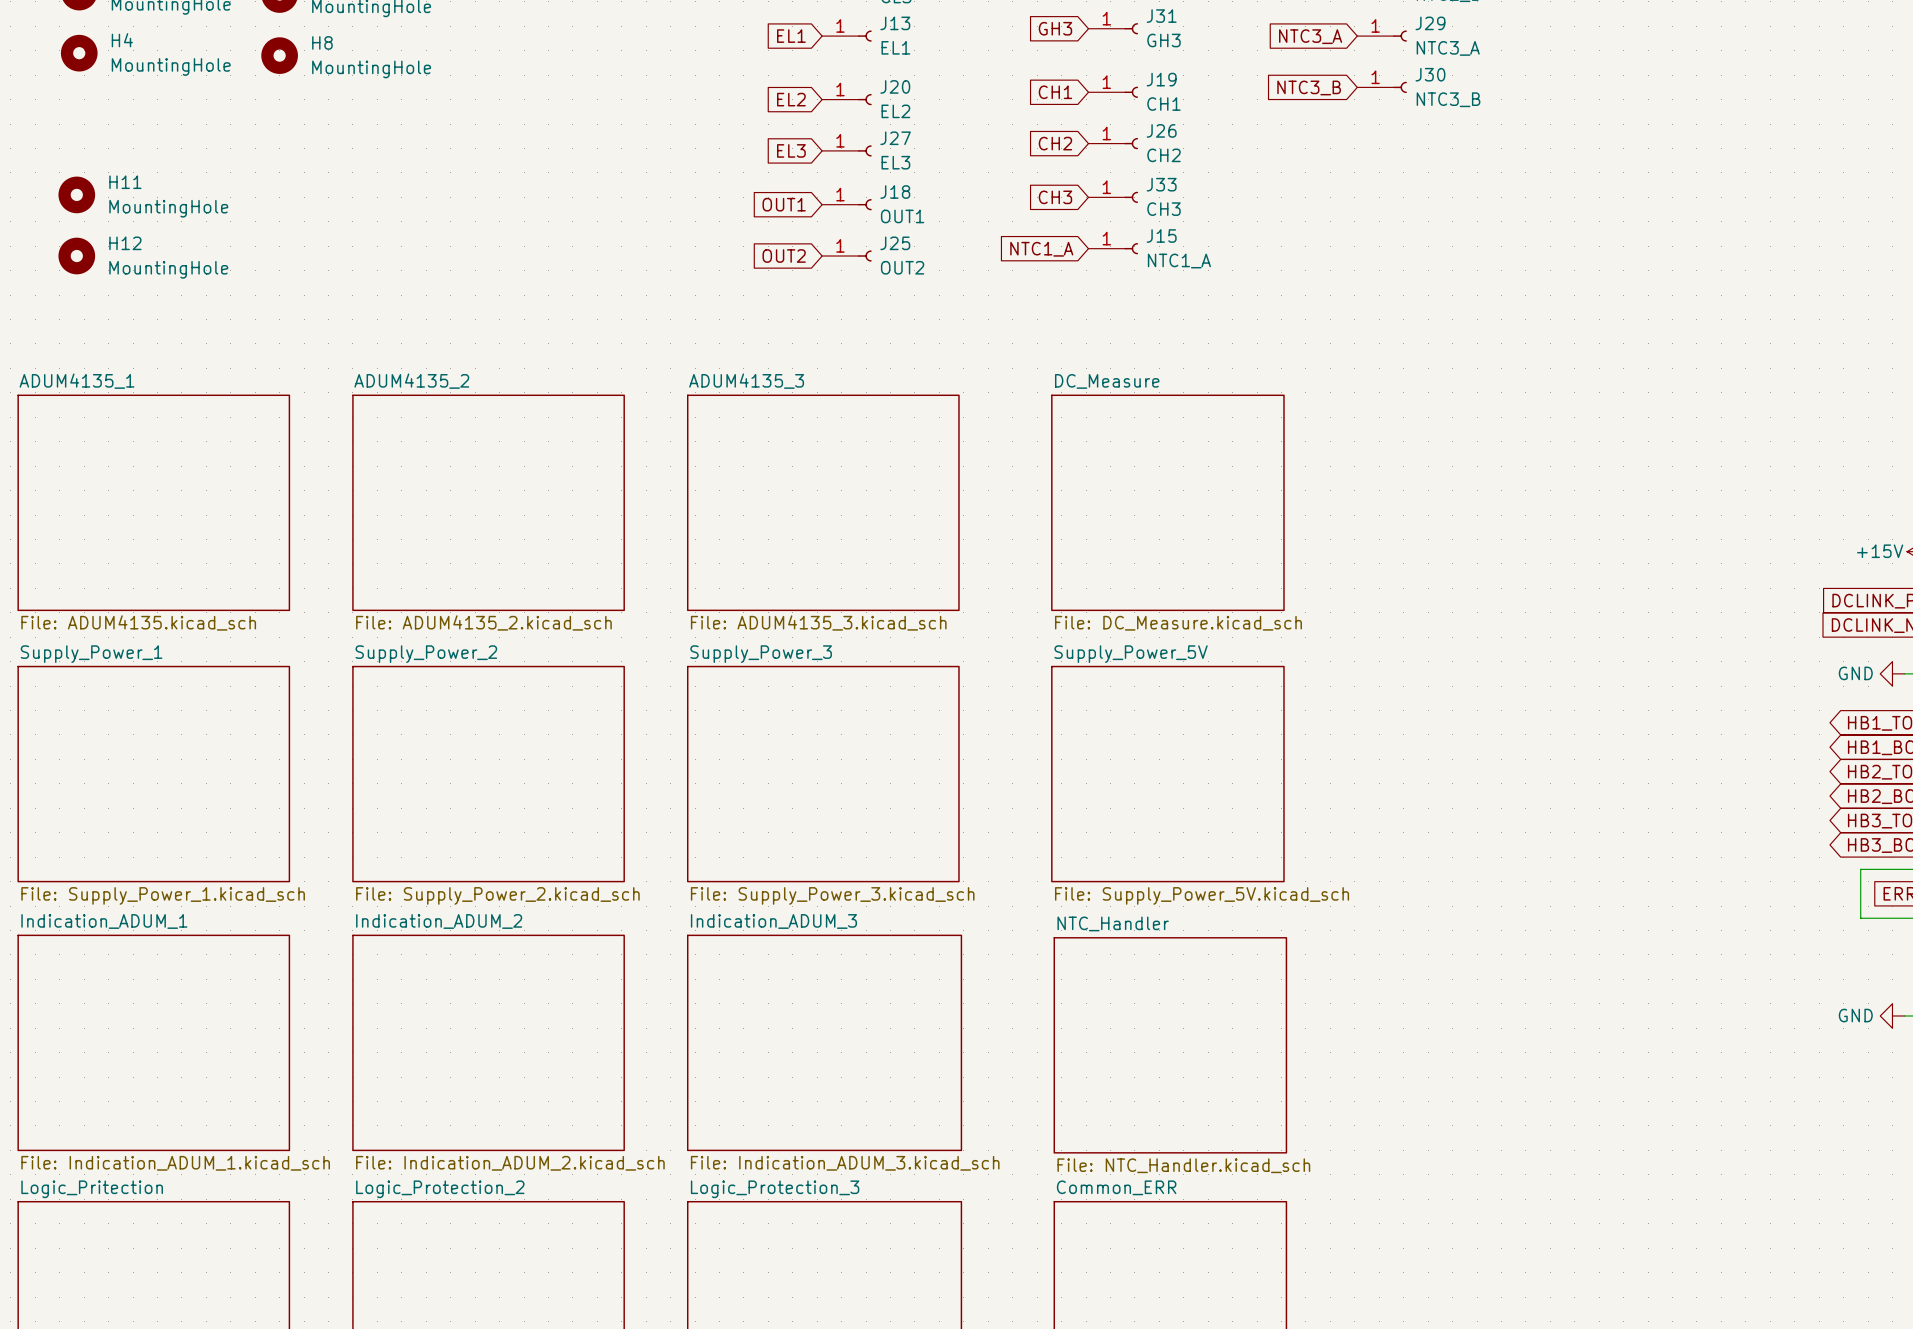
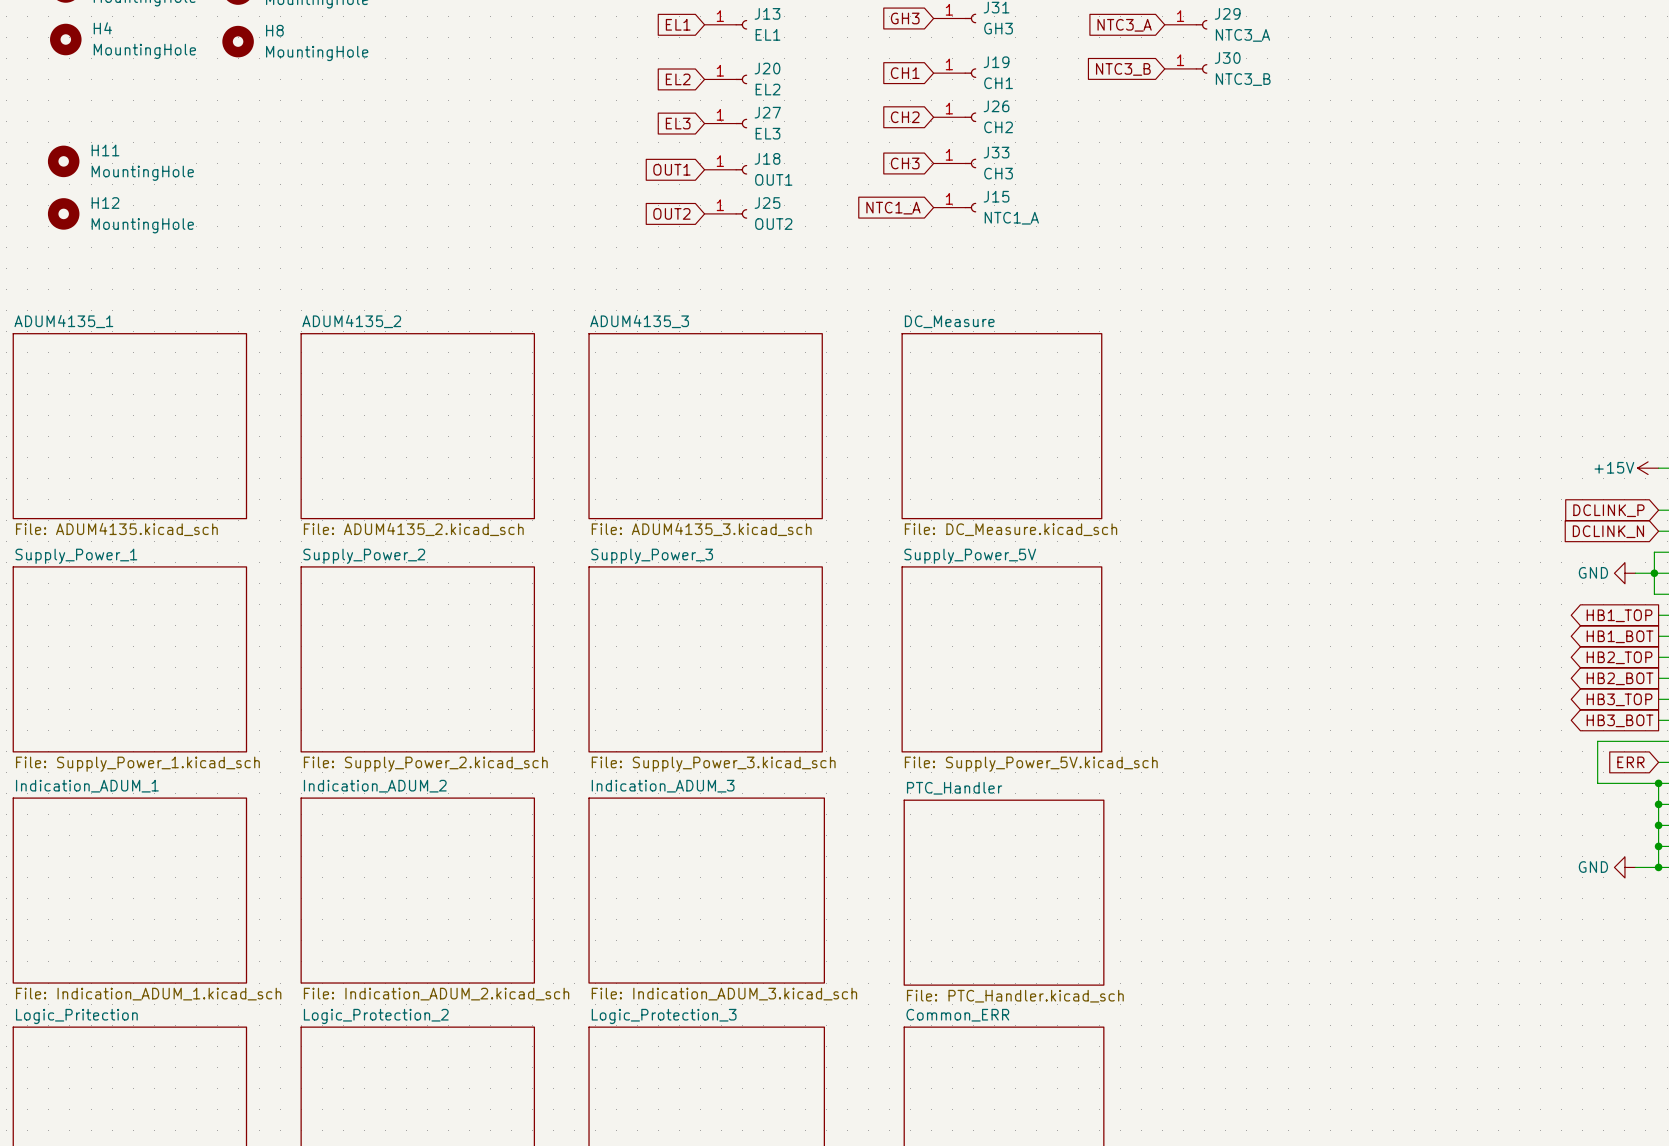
sheet NTC_Handler name: NTC_Handler (1113, 923) -> PTC_Handler (954, 788)
sheet NTC_Handler value: File: NTC_Handler.kicad_sch (1183, 1165) -> File: PTC_Handler.kicad_sch (1015, 996)

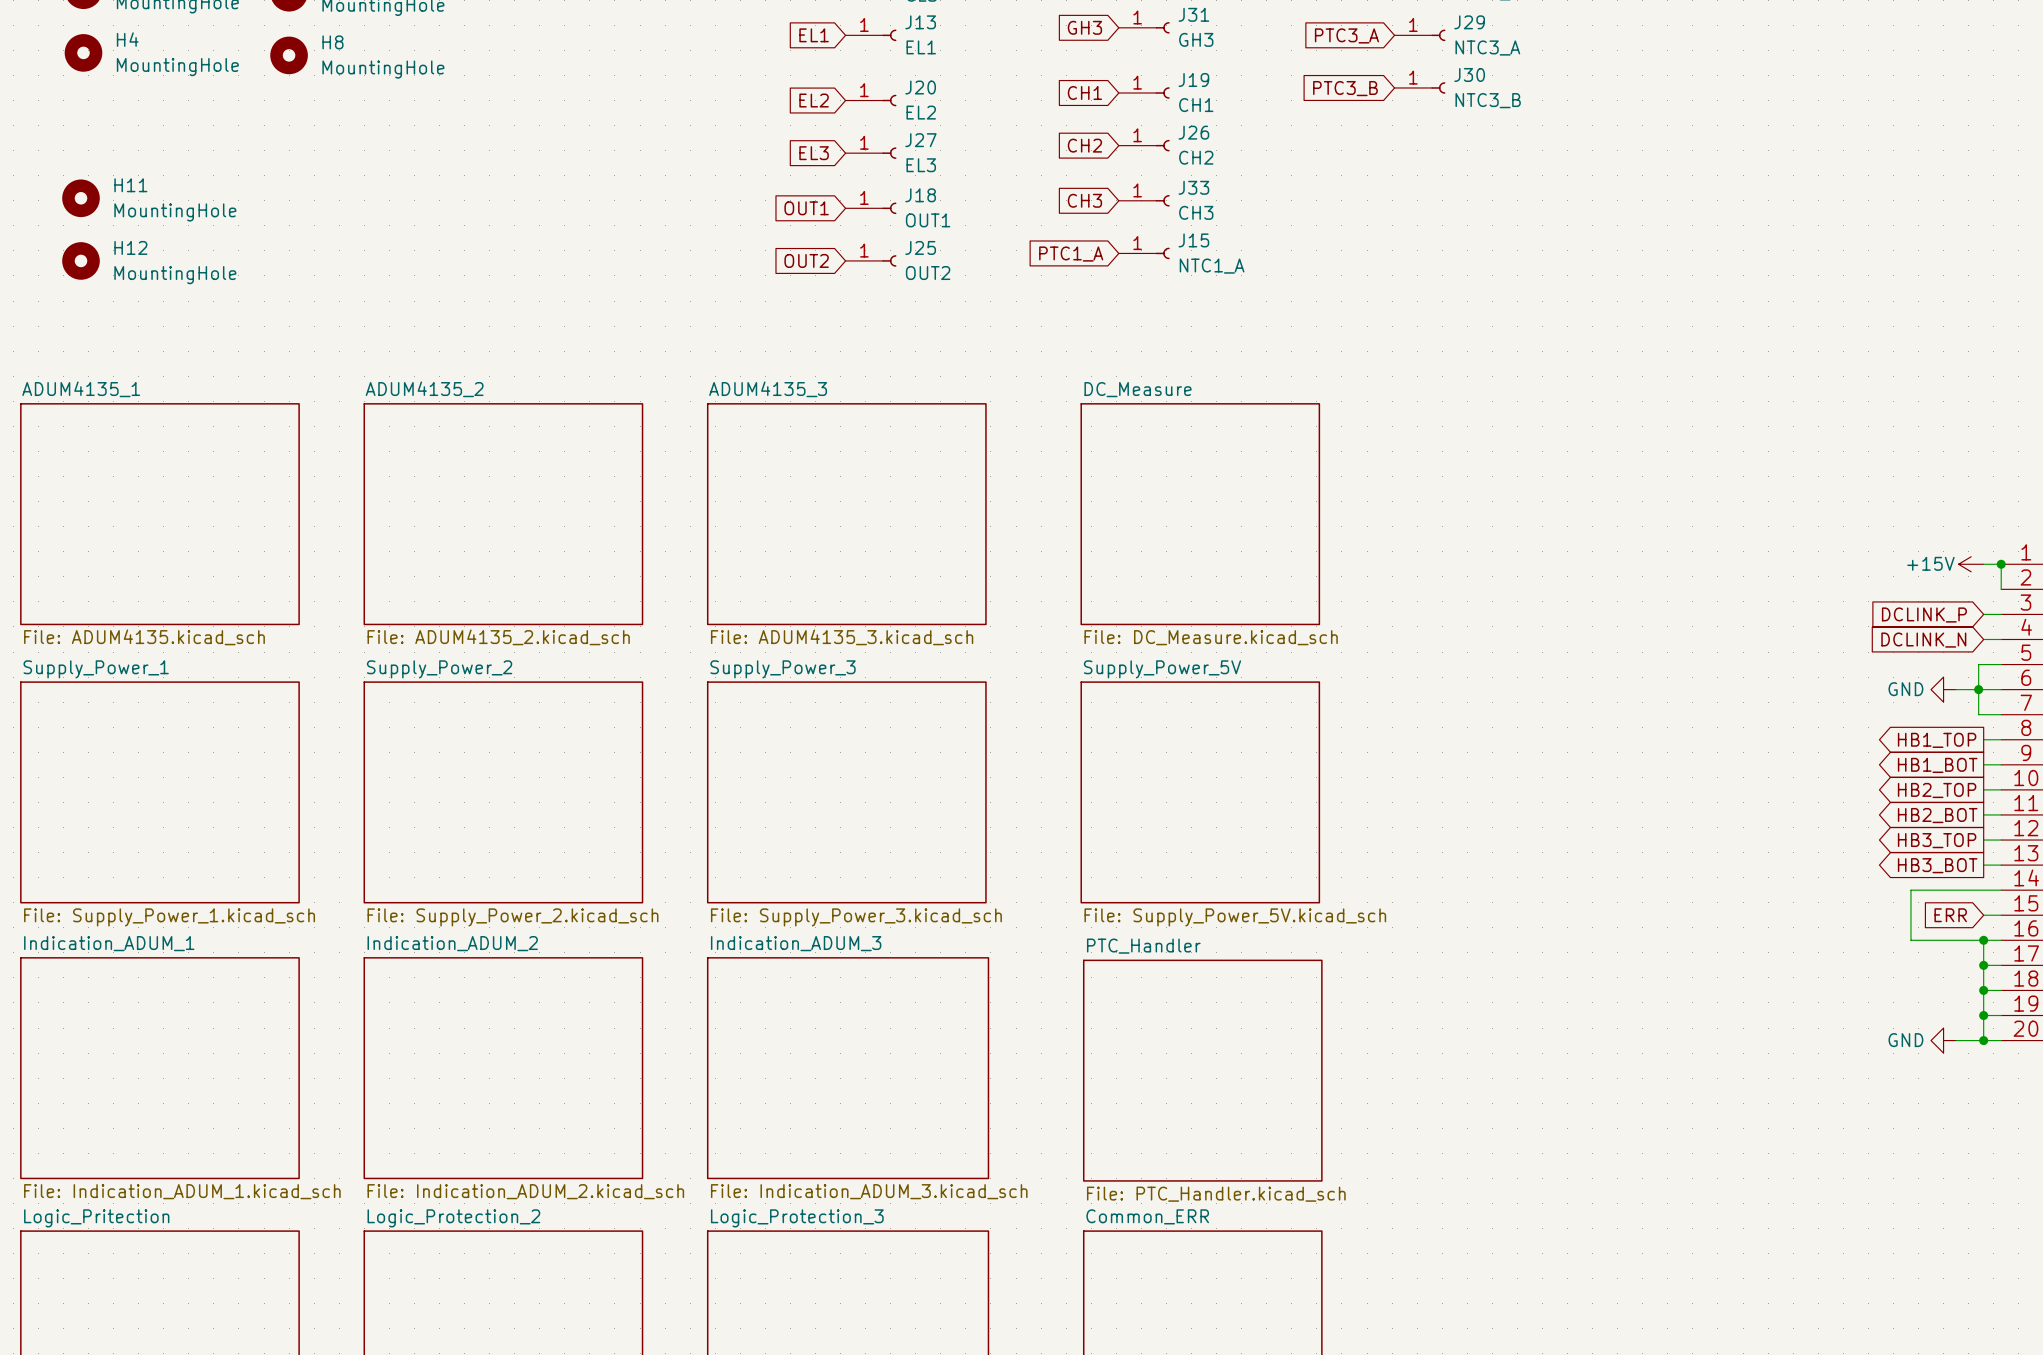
global label: NTC3_A (1124, 25) -> PTC3_A (1346, 35)
global label: NTC3_B (1123, 69) -> PTC3_B (1345, 88)
global label: NTC1_A (893, 208) -> PTC1_A (1071, 254)

